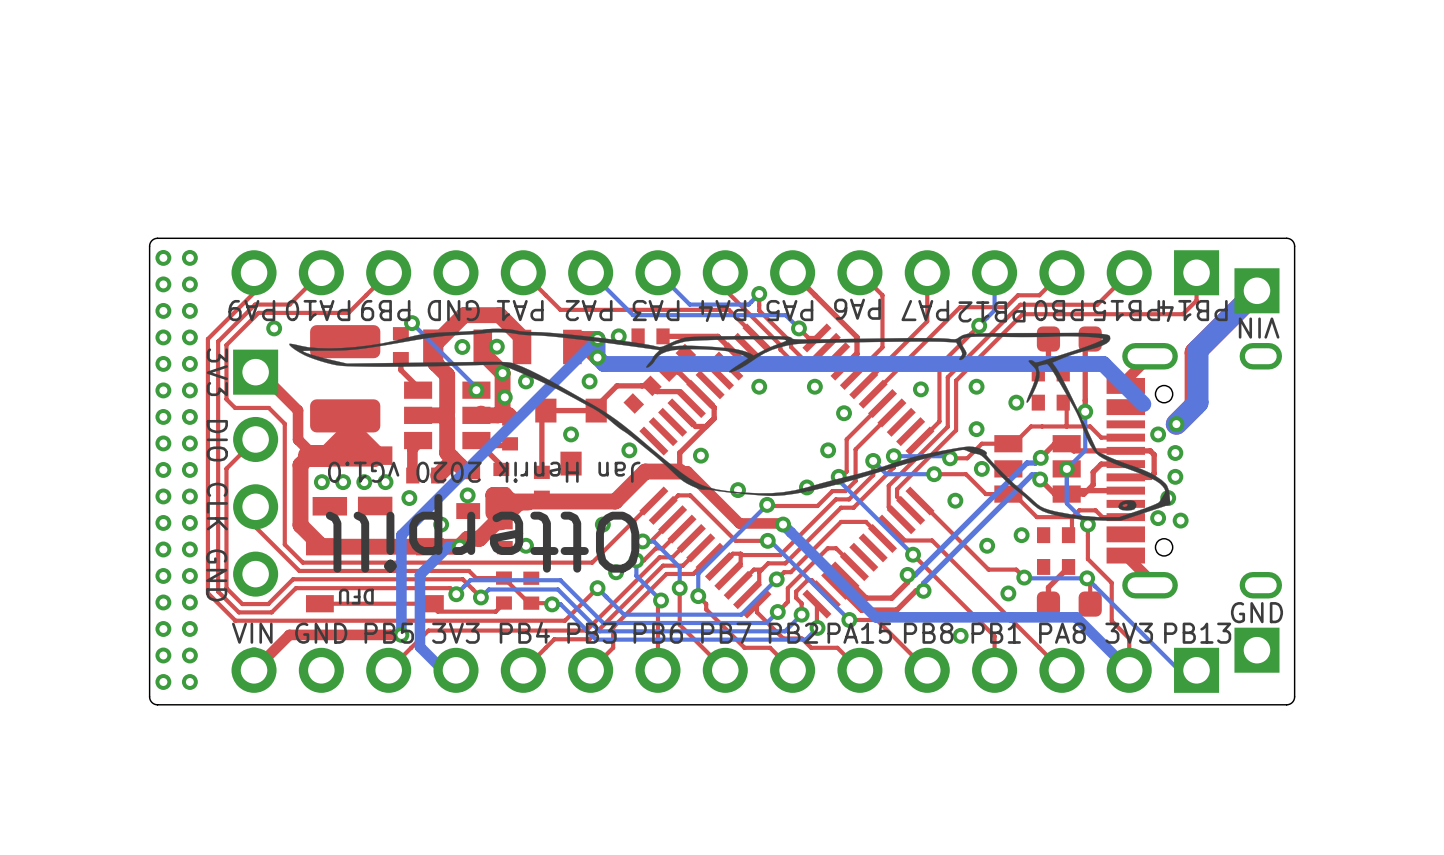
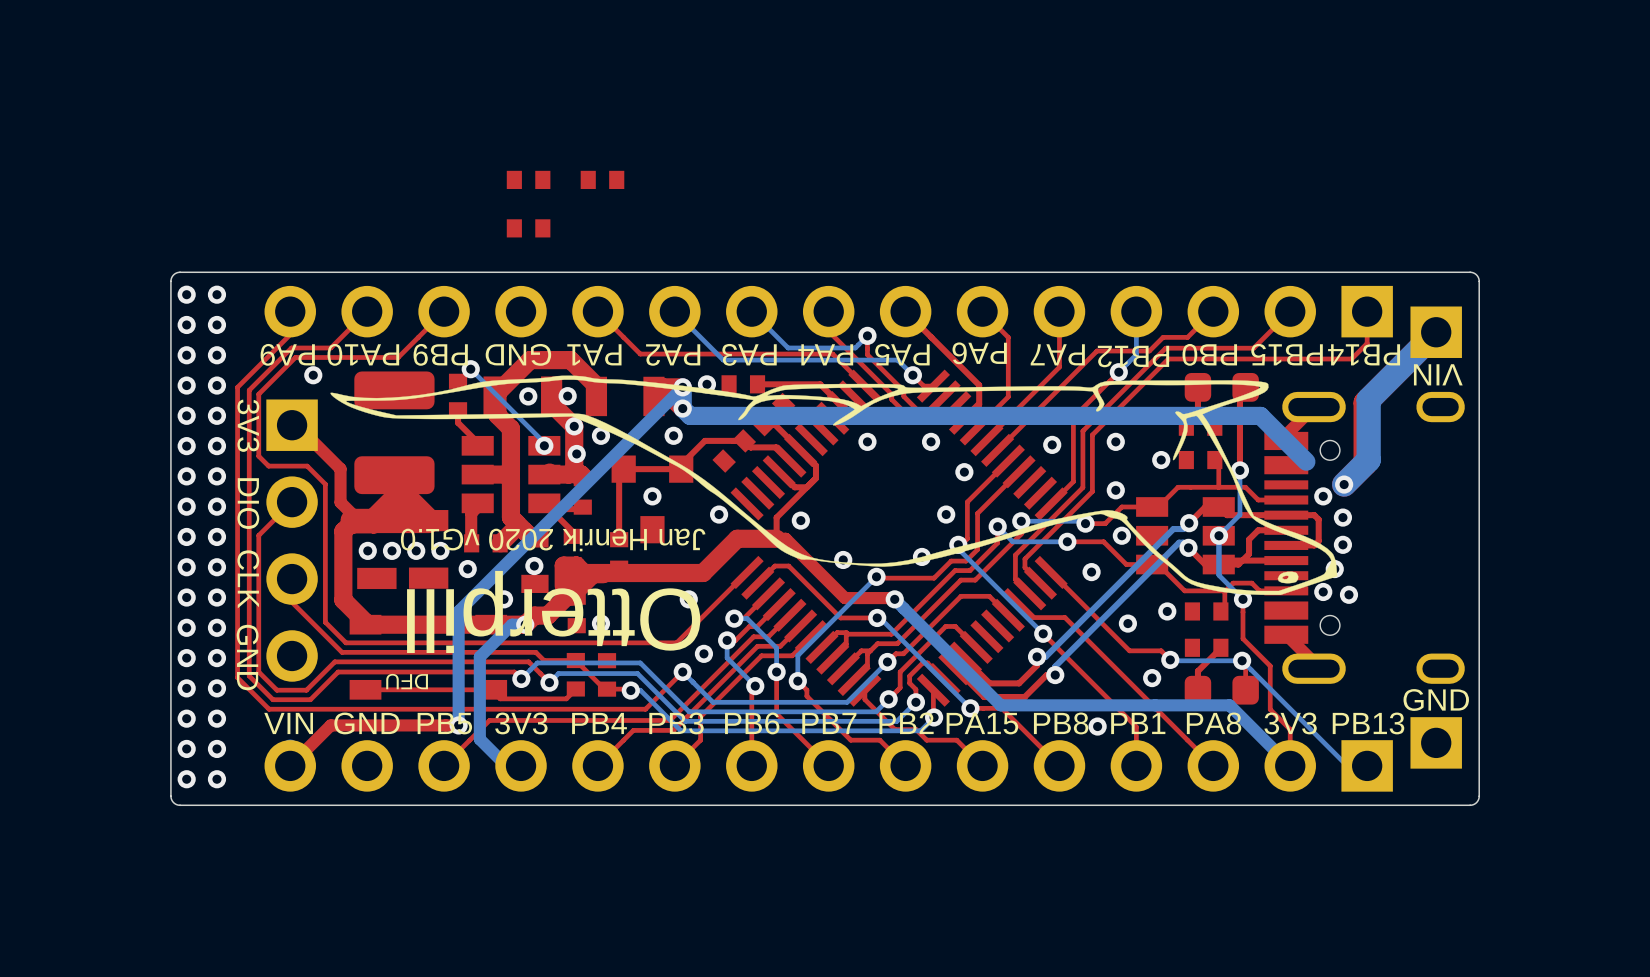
part: none -> (528, 179)
part: none -> (602, 179)
part: none -> (528, 228)

